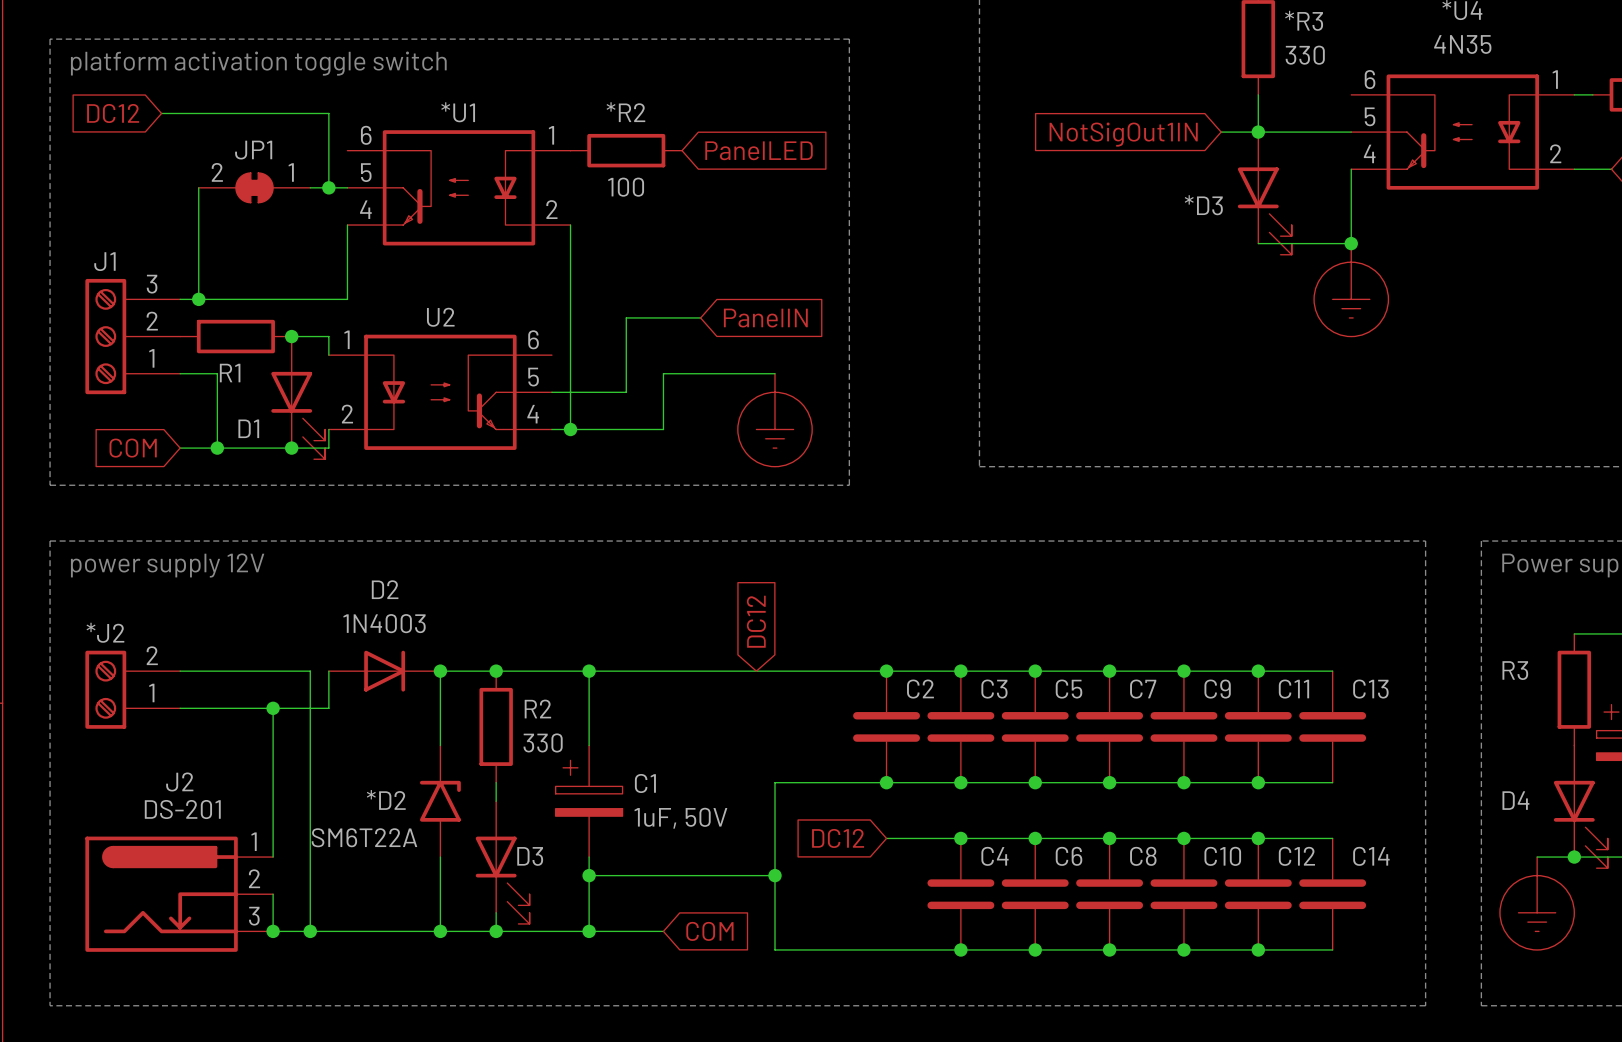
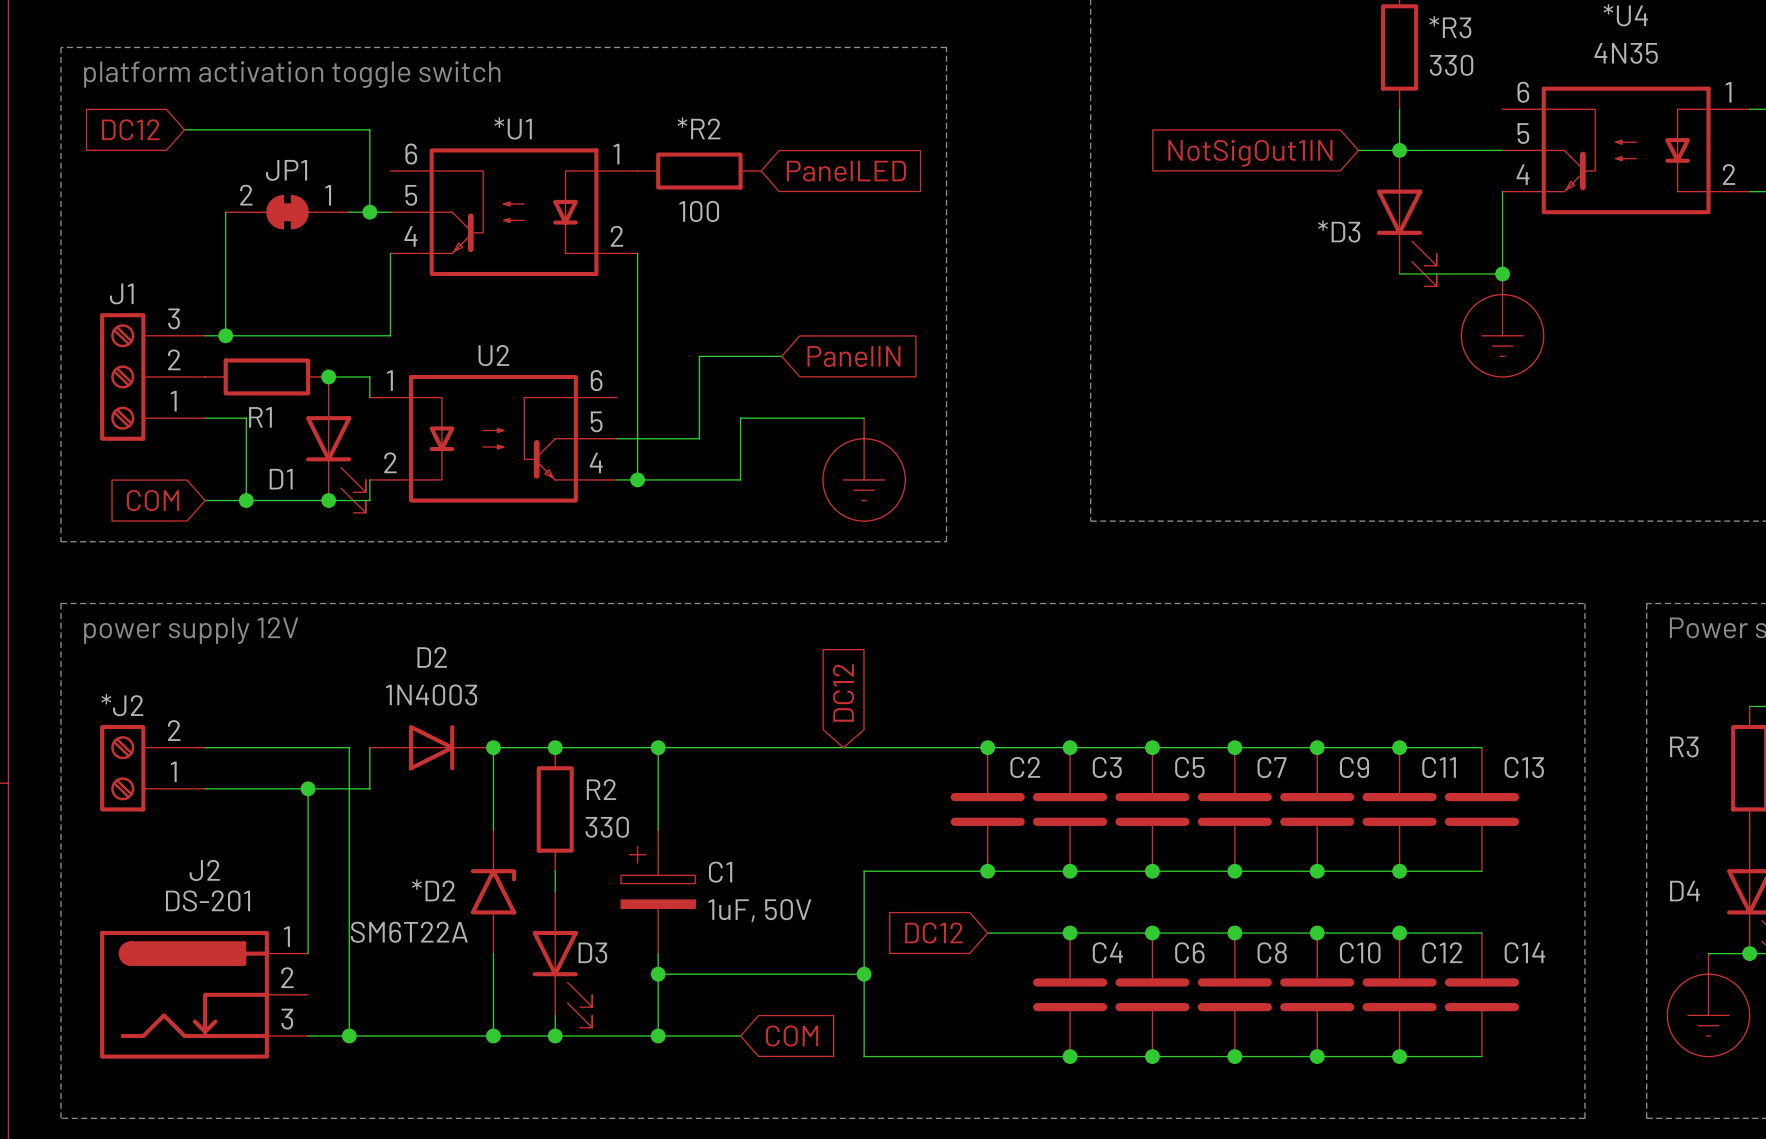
wire: (273, 894) (273, 931) -> none
junction: (273, 931) -> none

